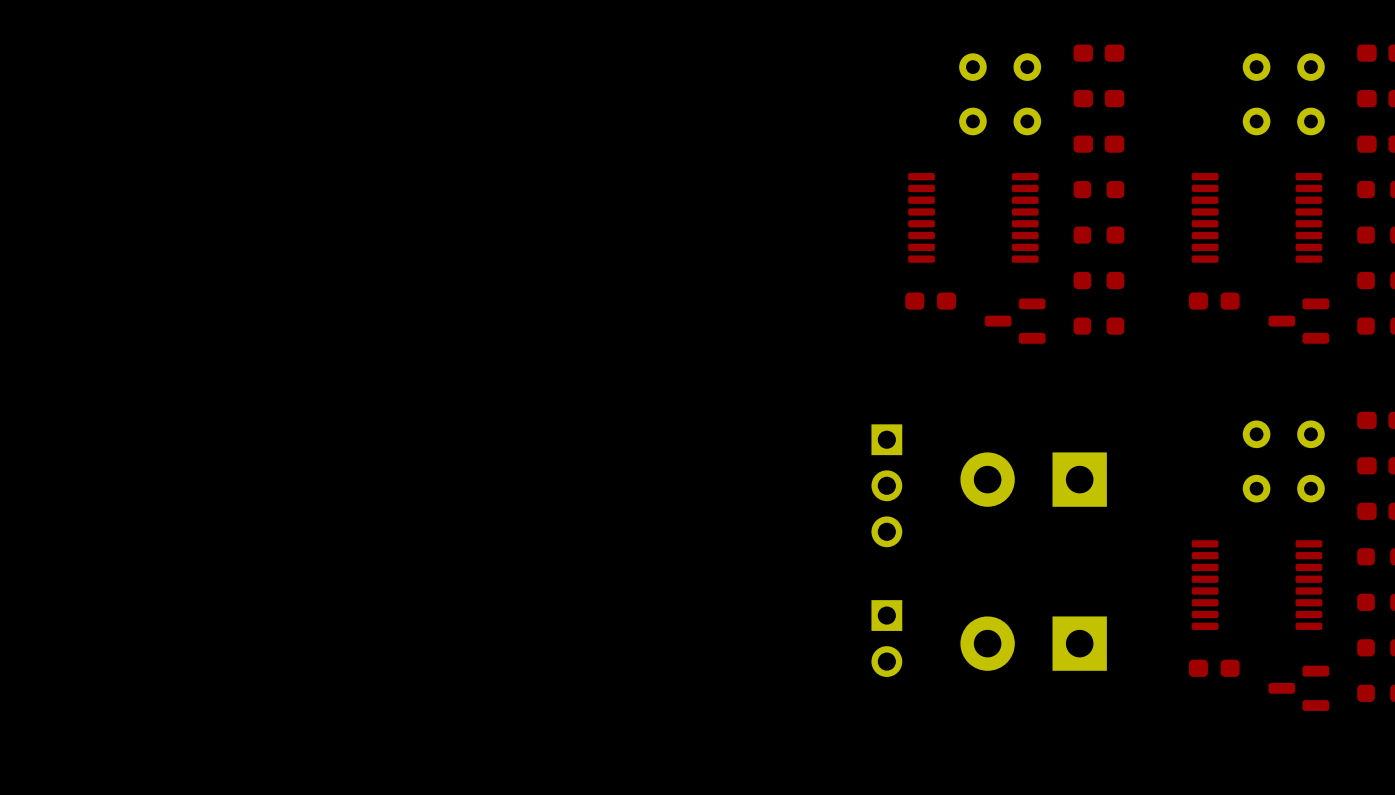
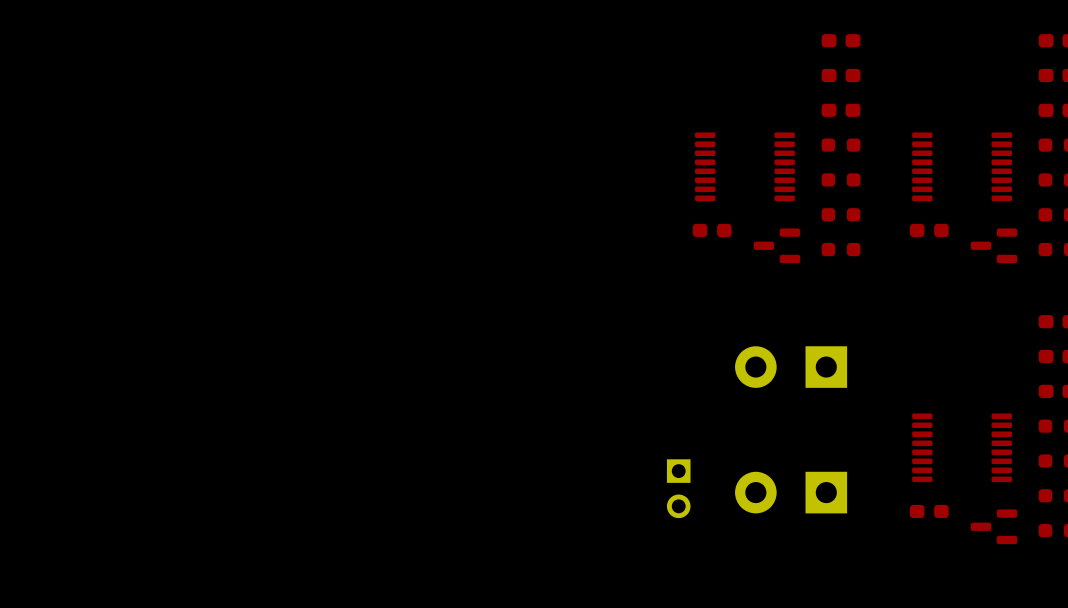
part: (1000, 94) -> none
part: (1283, 94) -> none
part: (1283, 461) -> none
part: (886, 485) -> none

